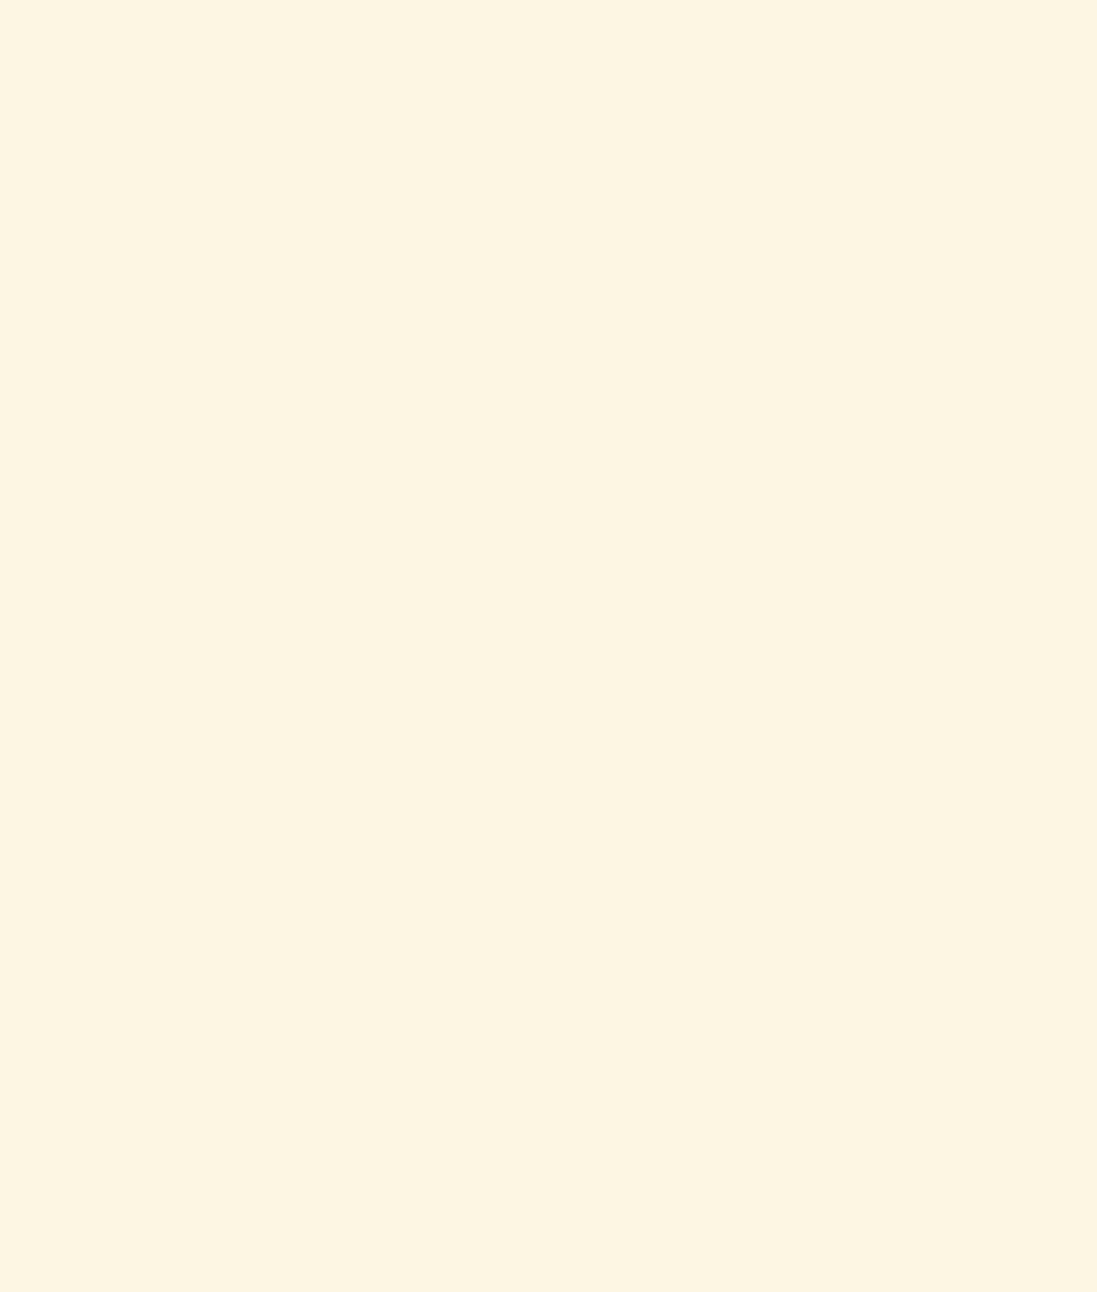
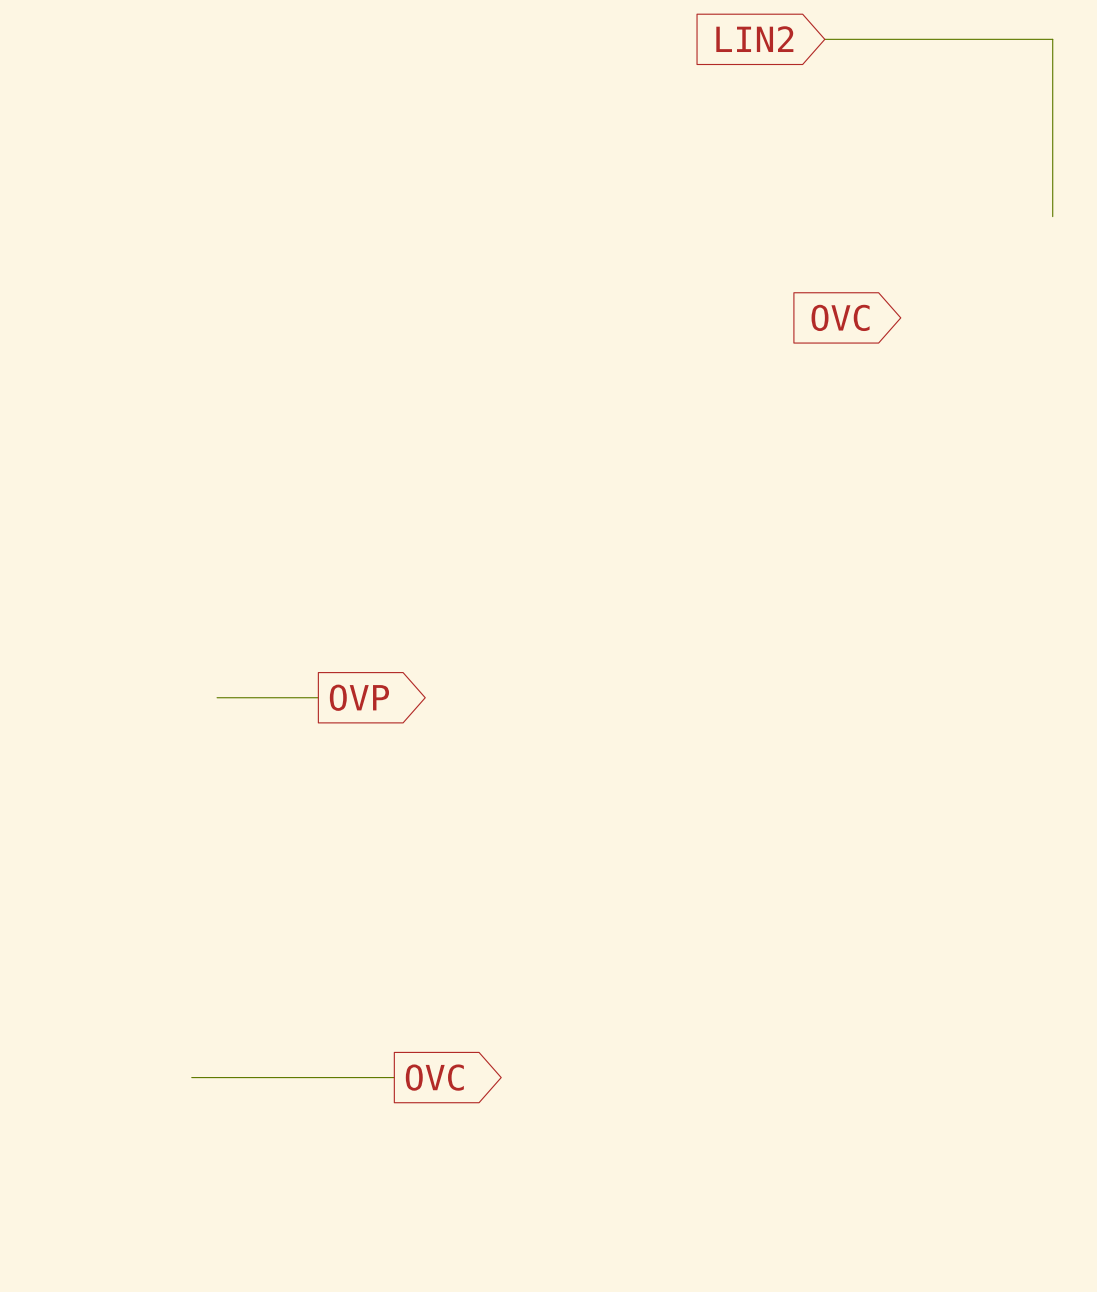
global label: none -> LIN2 (754, 39)
wire: none -> (824, 39) (1052, 39) (1052, 216)
global label: none -> OVC (840, 317)
wire: none -> (217, 697) (318, 697)
global label: none -> OVP (359, 697)
wire: none -> (191, 1077) (394, 1077)
global label: none -> OVC (434, 1077)

